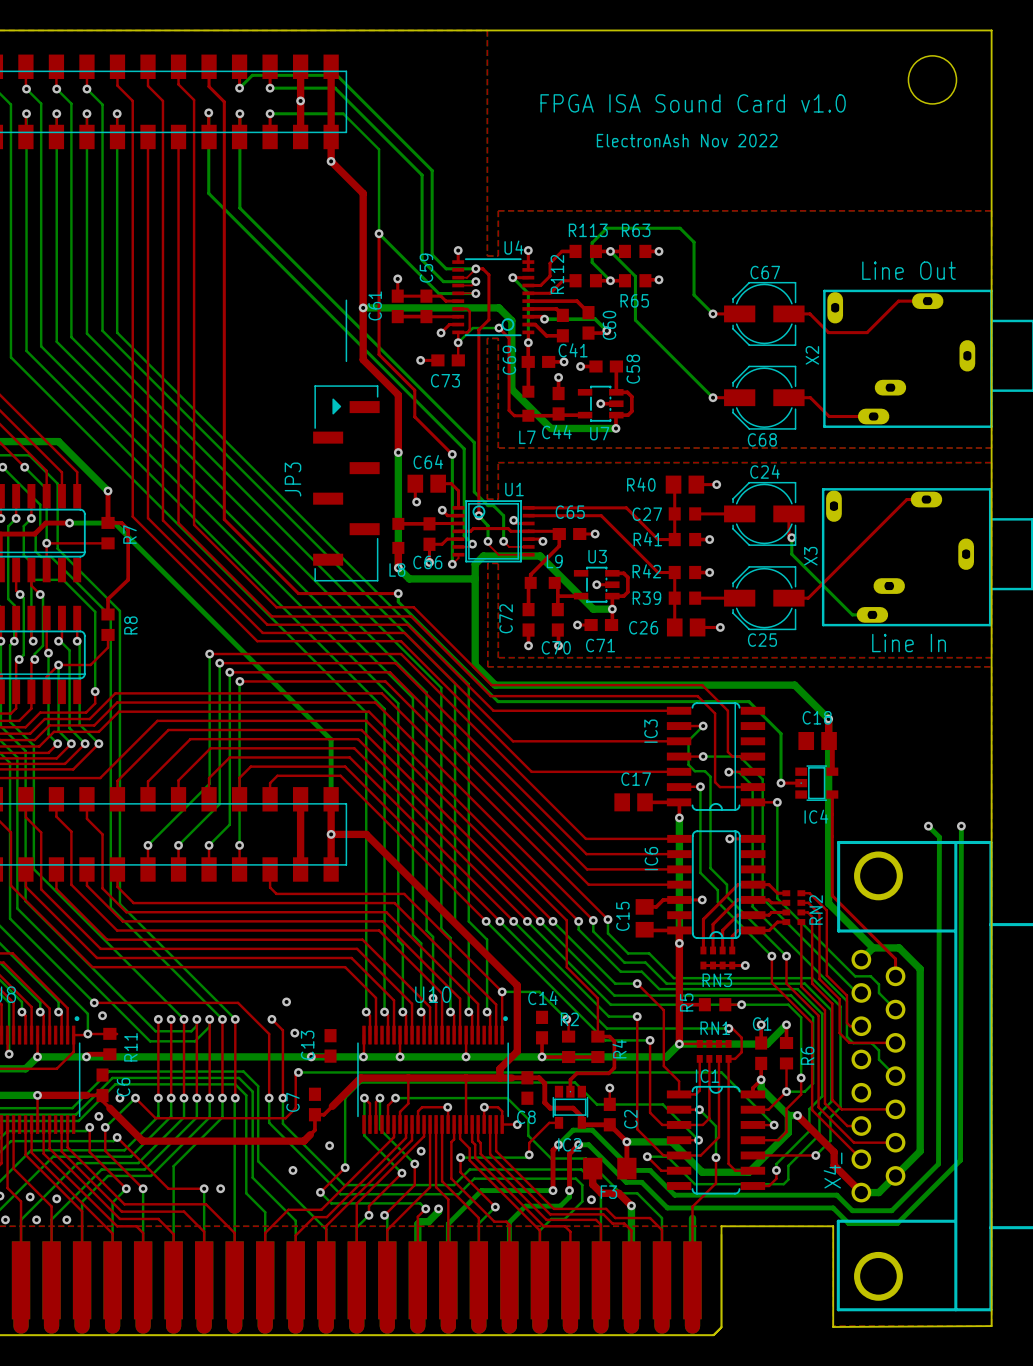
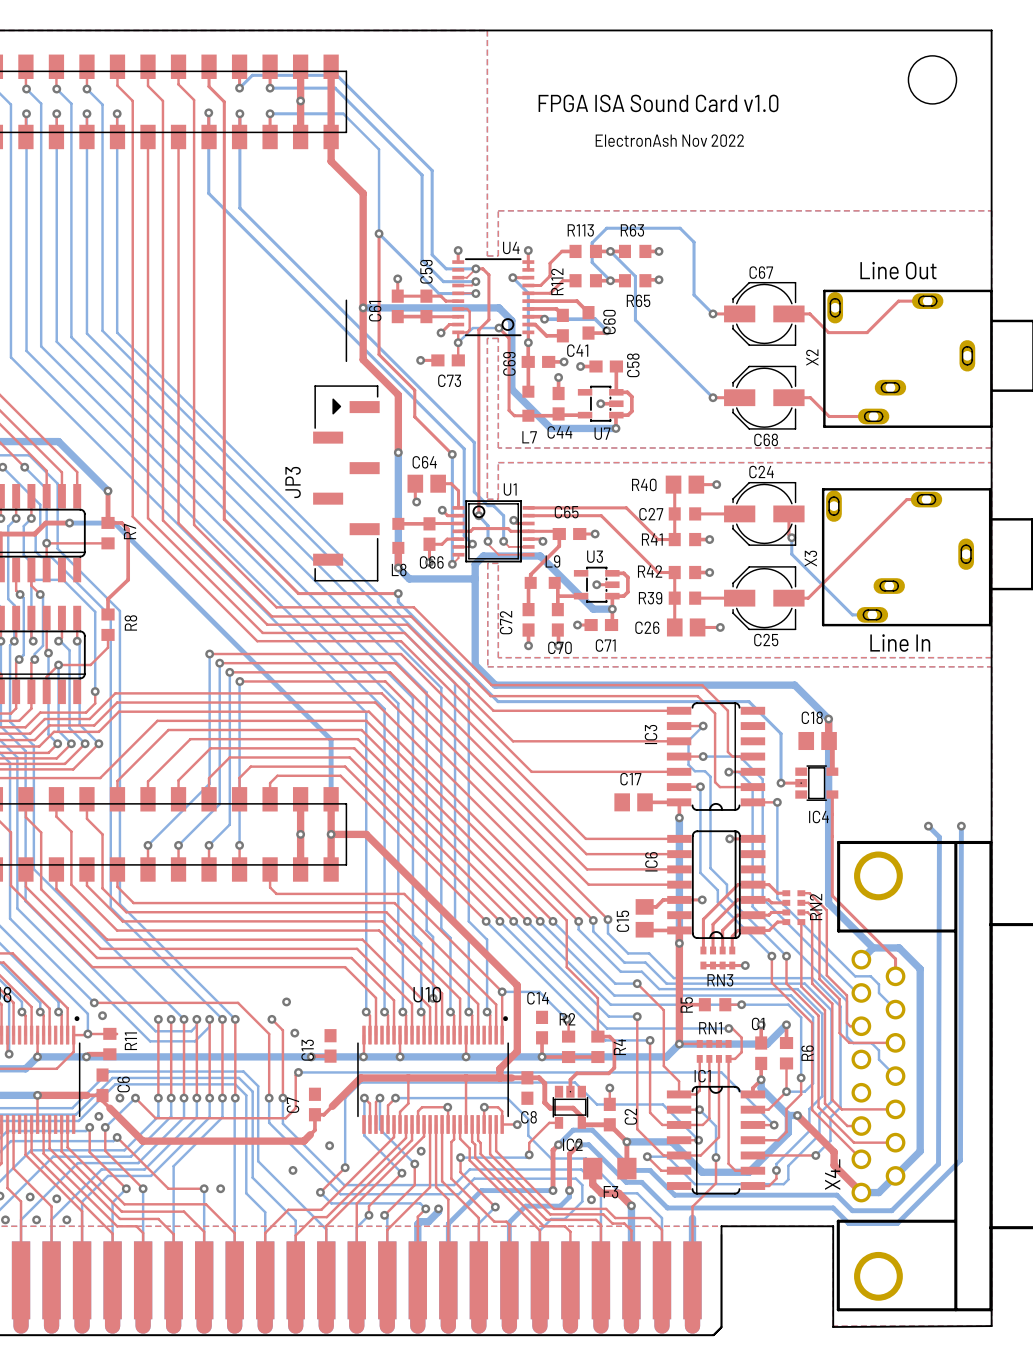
via: (331, 161) -> none
via: none -> (300, 834)

